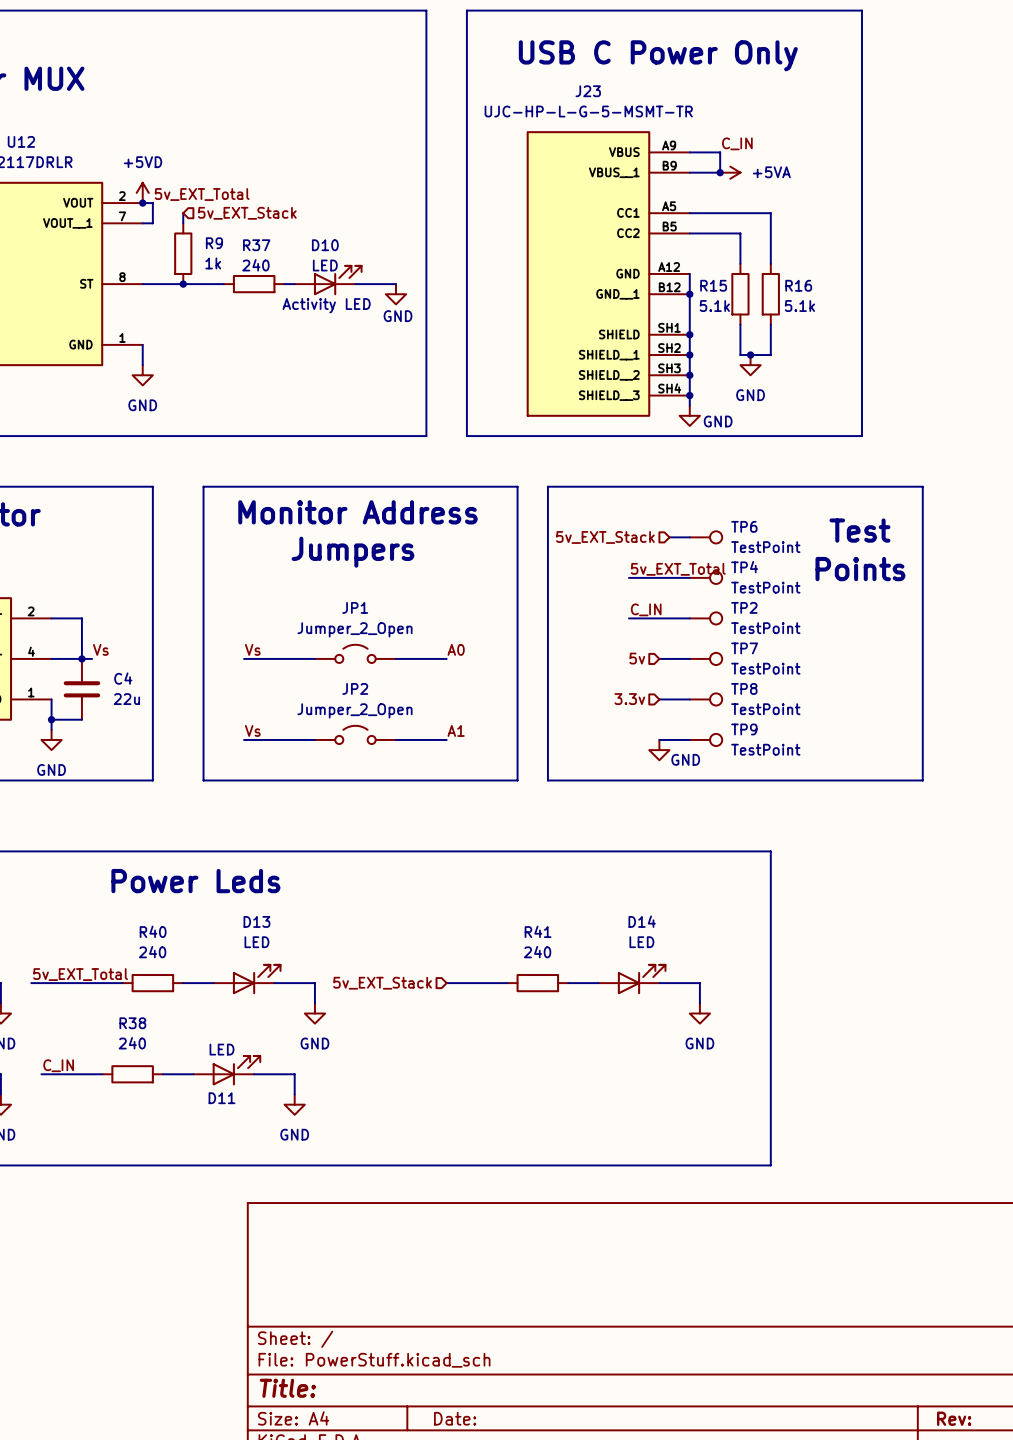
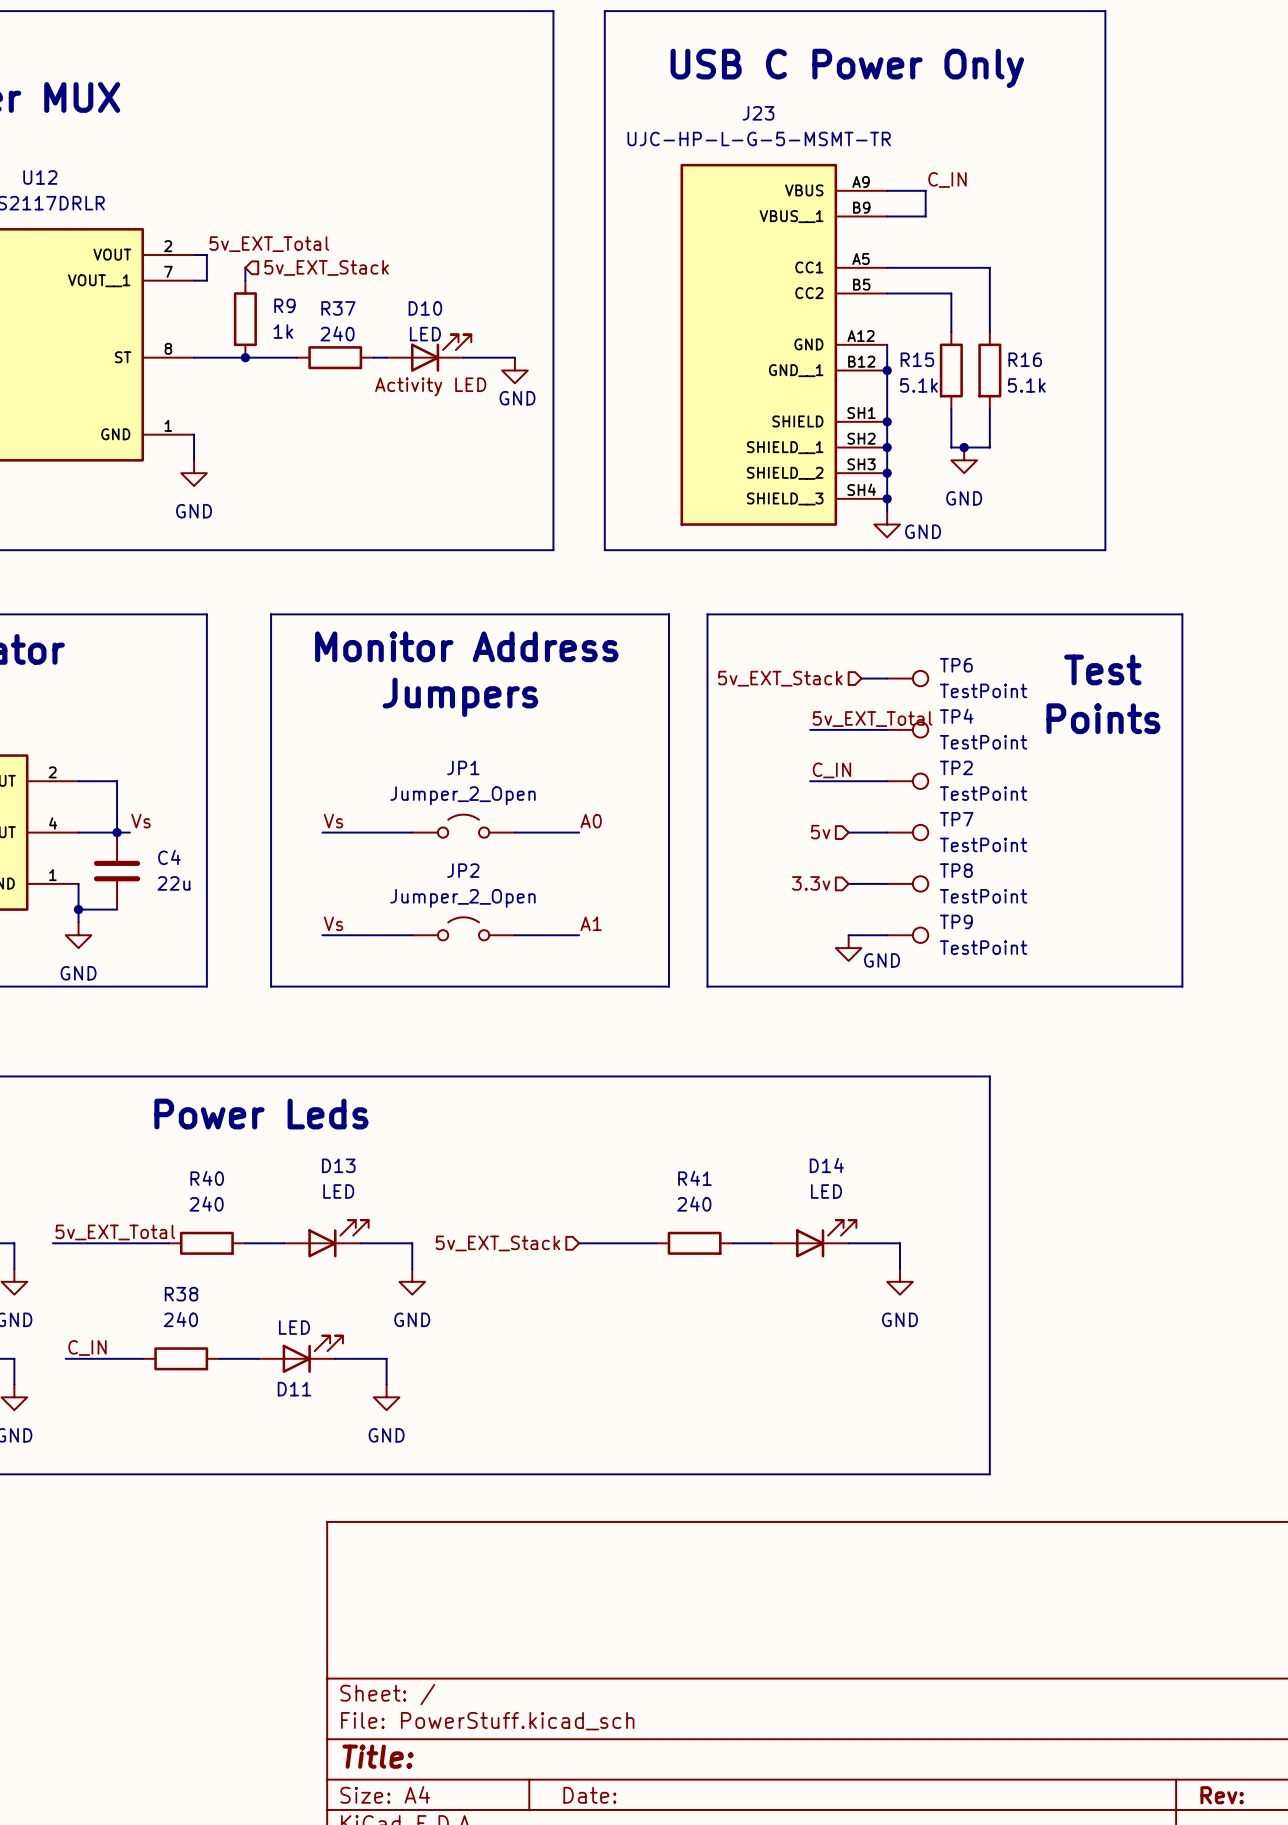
junction: (720, 172) -> none
power symbol: +5VA (730, 172) -> none
power symbol: +5VD (142, 192) -> none
junction: (142, 203) -> none
text: Activity LED (326, 305) -> none
label: none -> Activity LED (430, 386)

